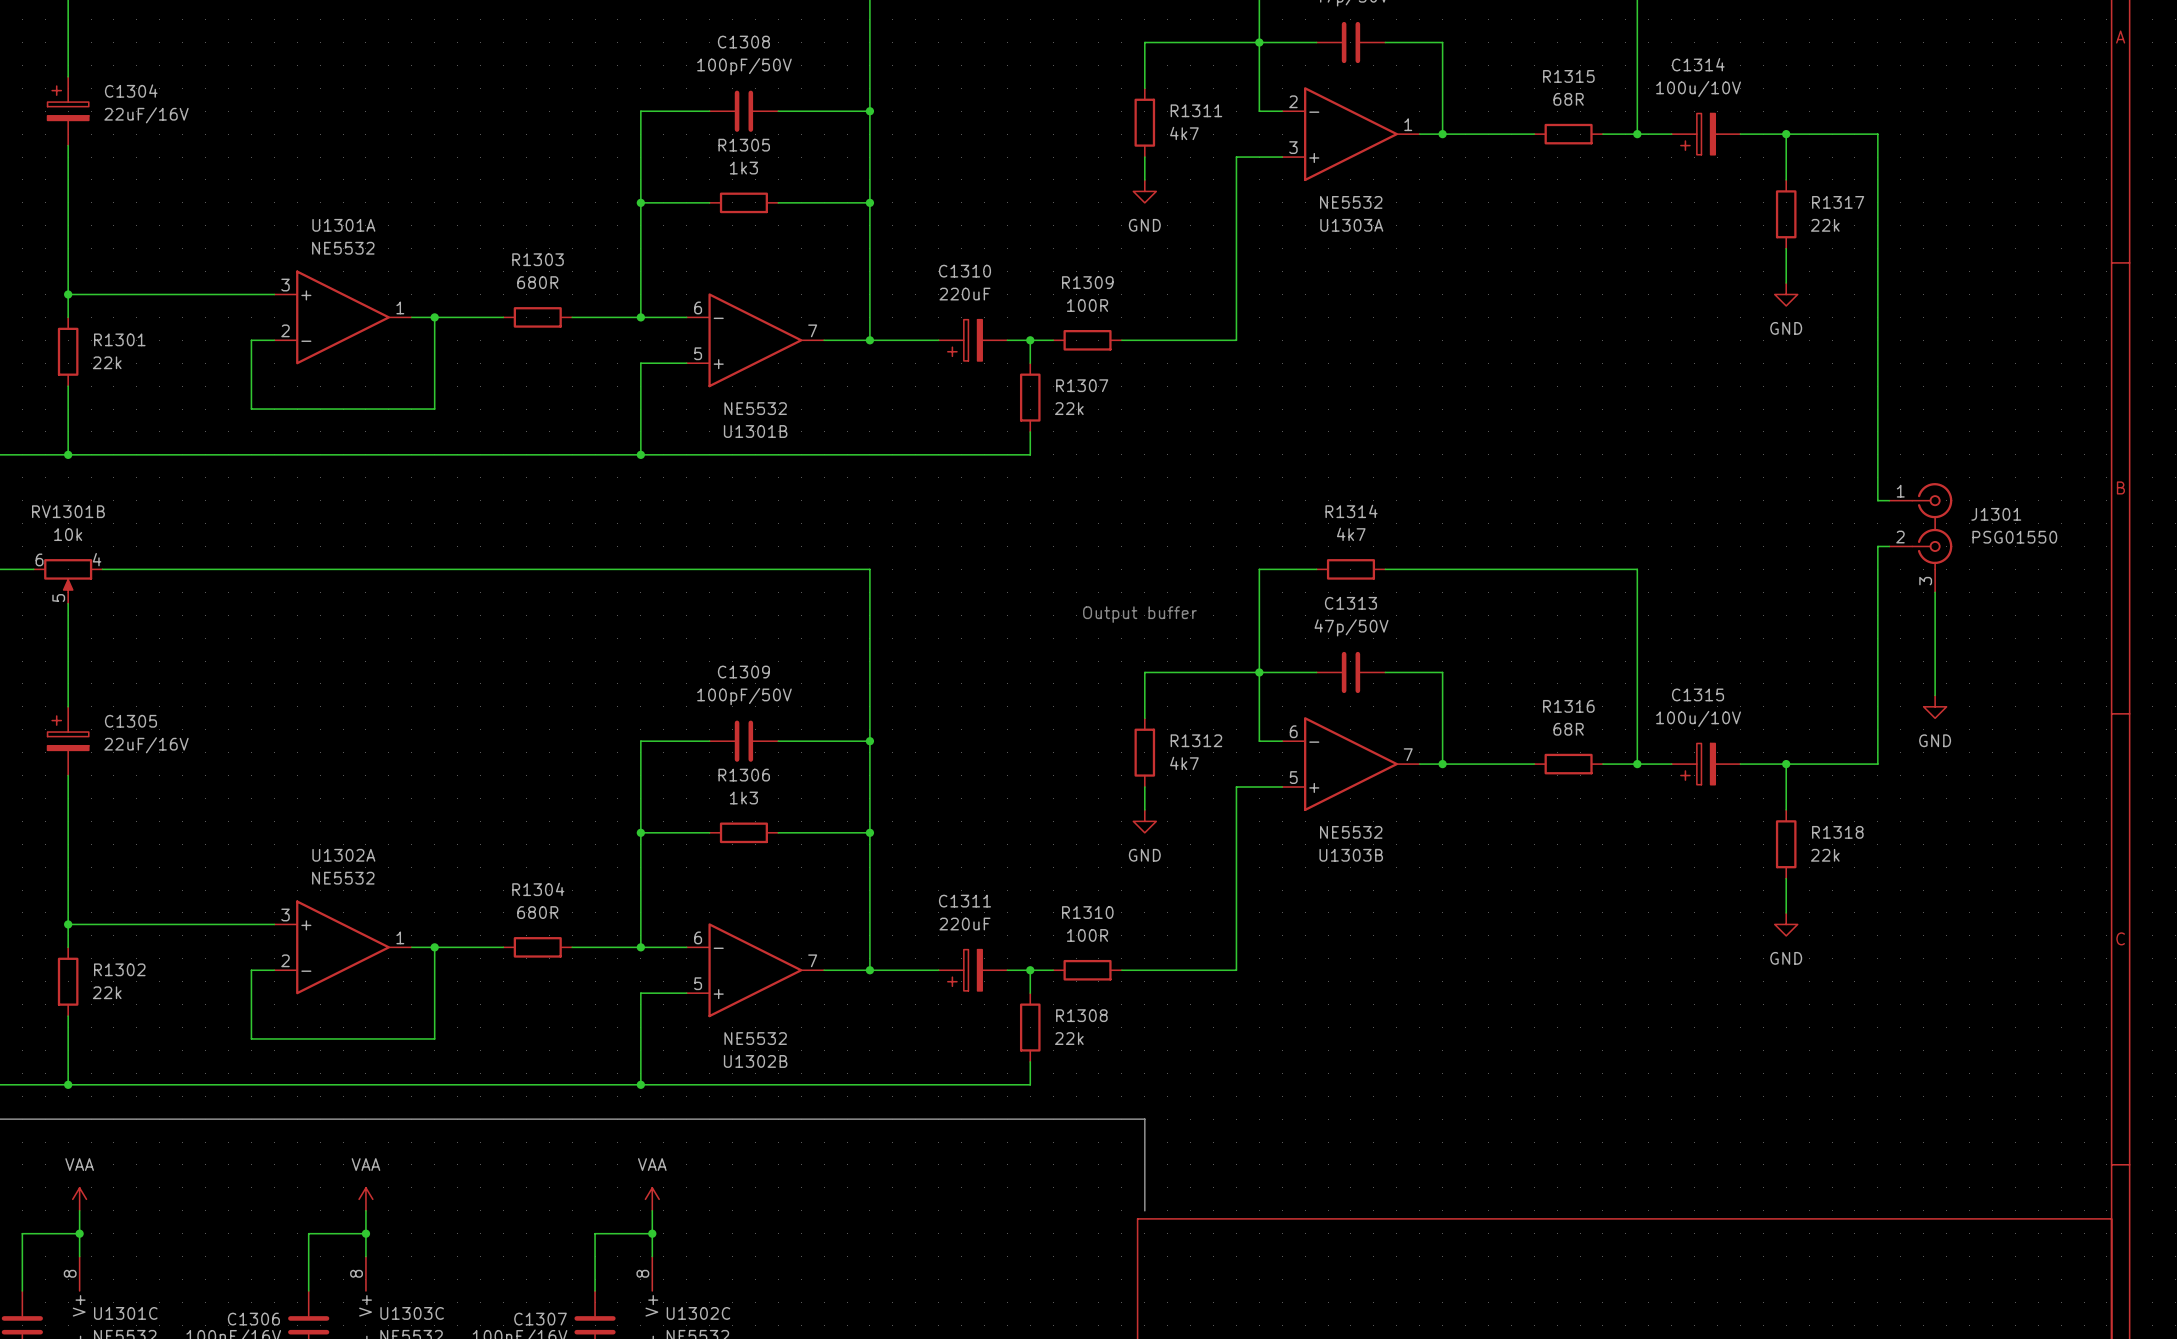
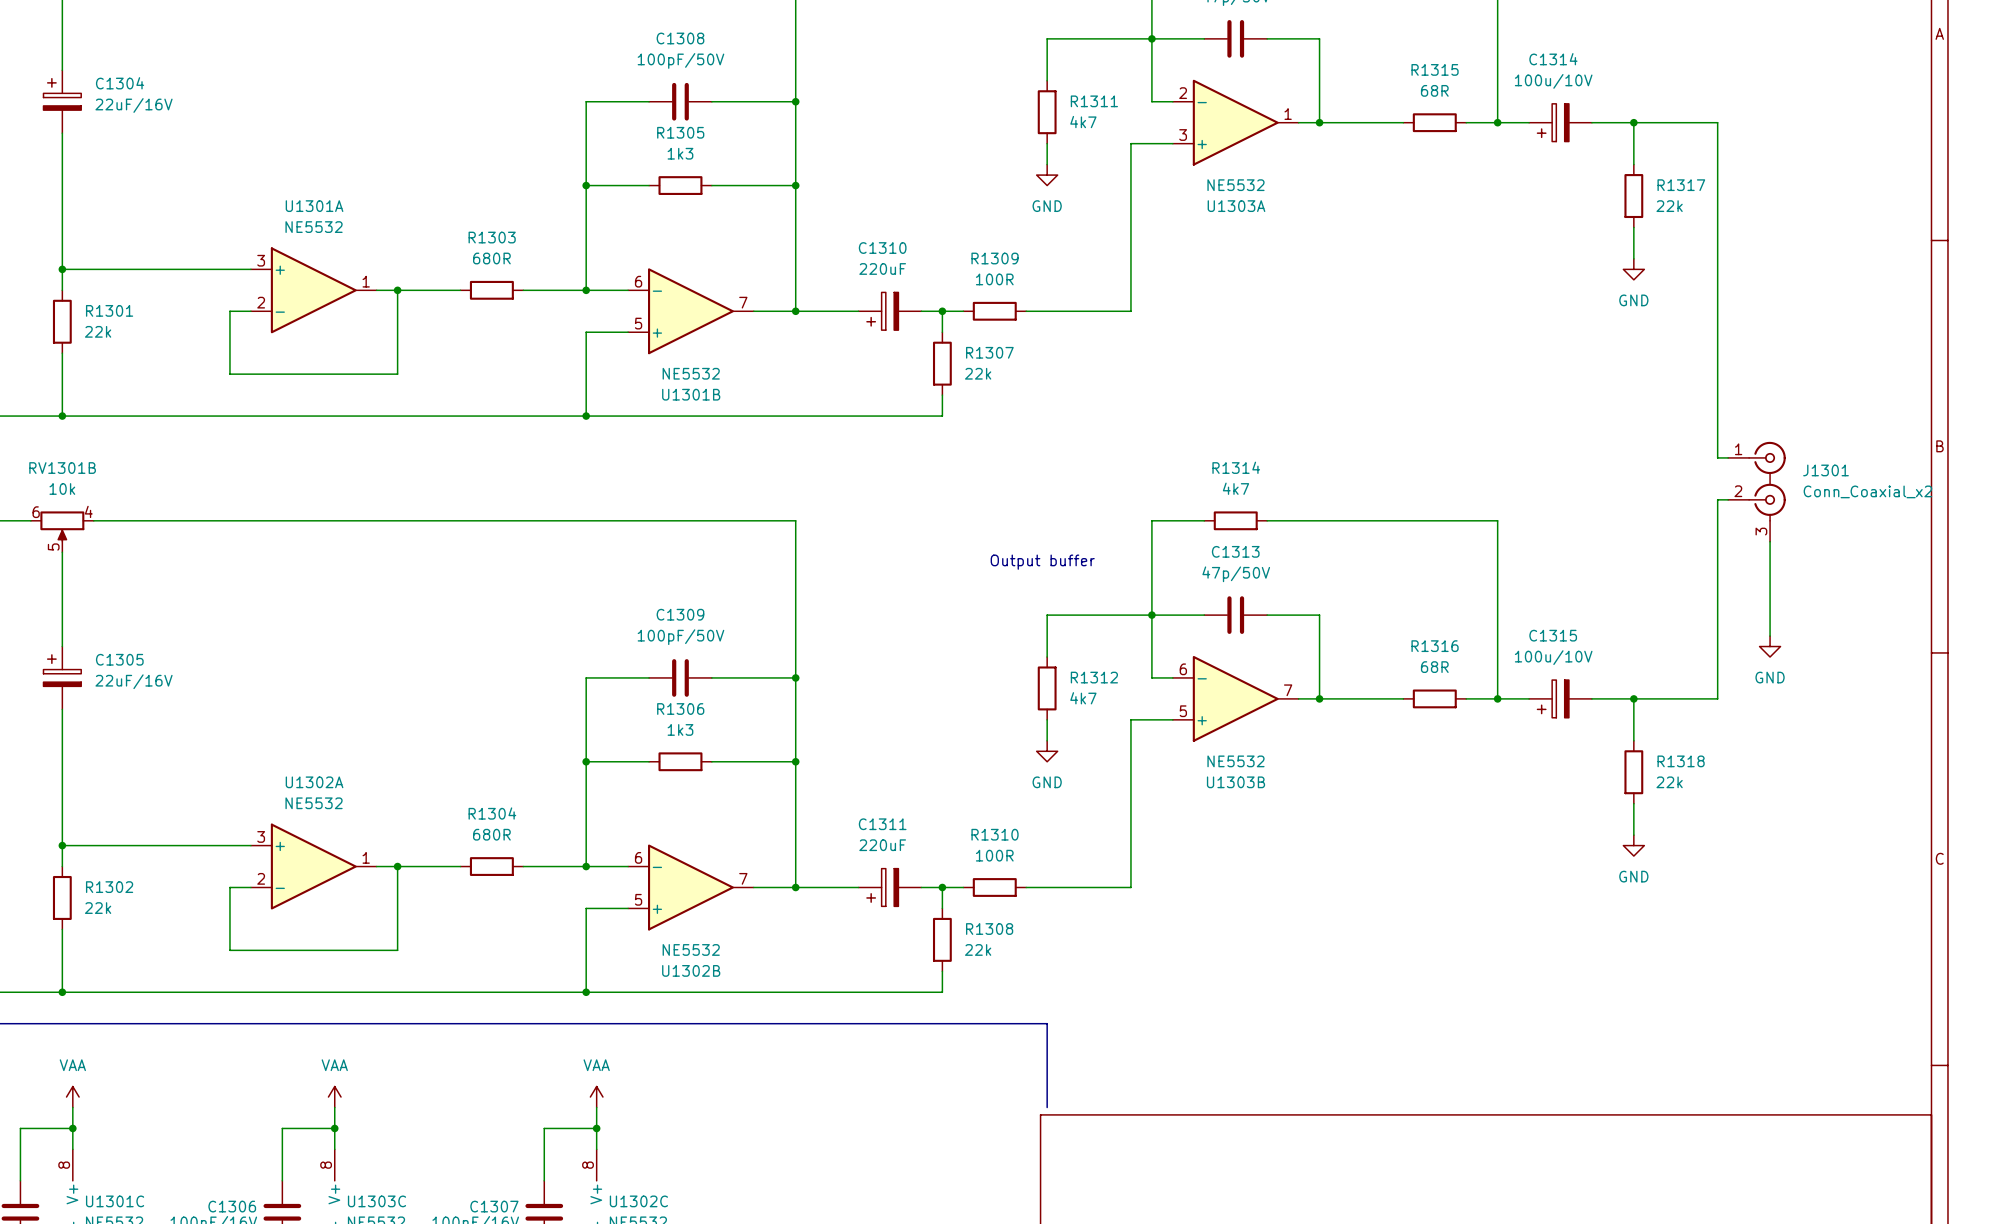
J1301 value: PSG01550 (2014, 537) -> Conn_Coaxial_x2 (1867, 491)

